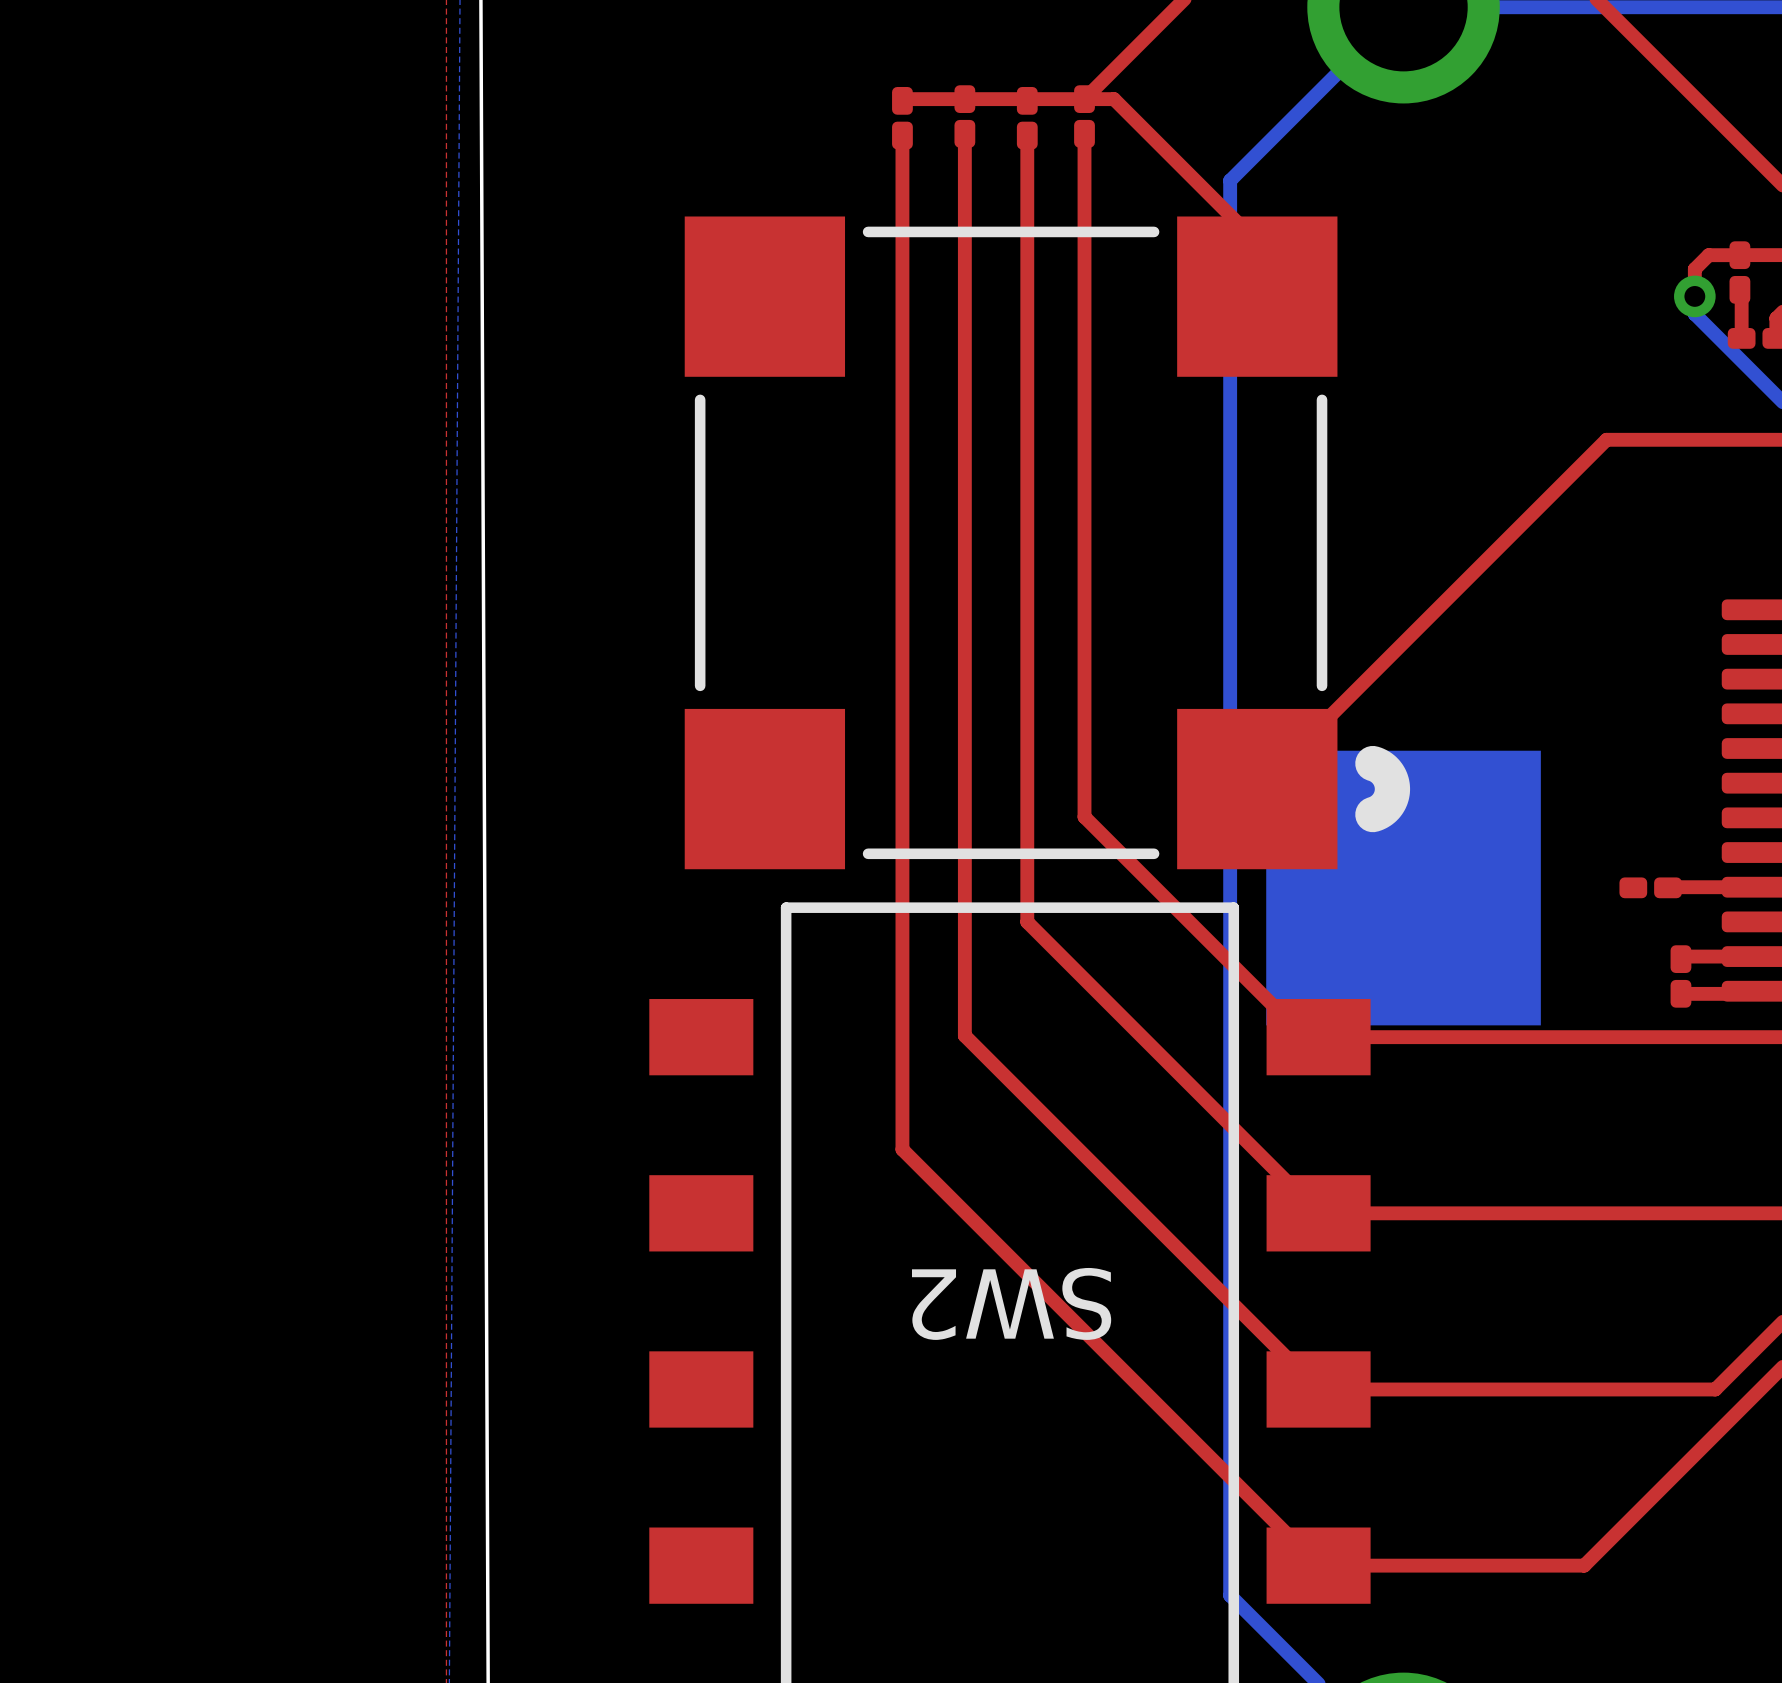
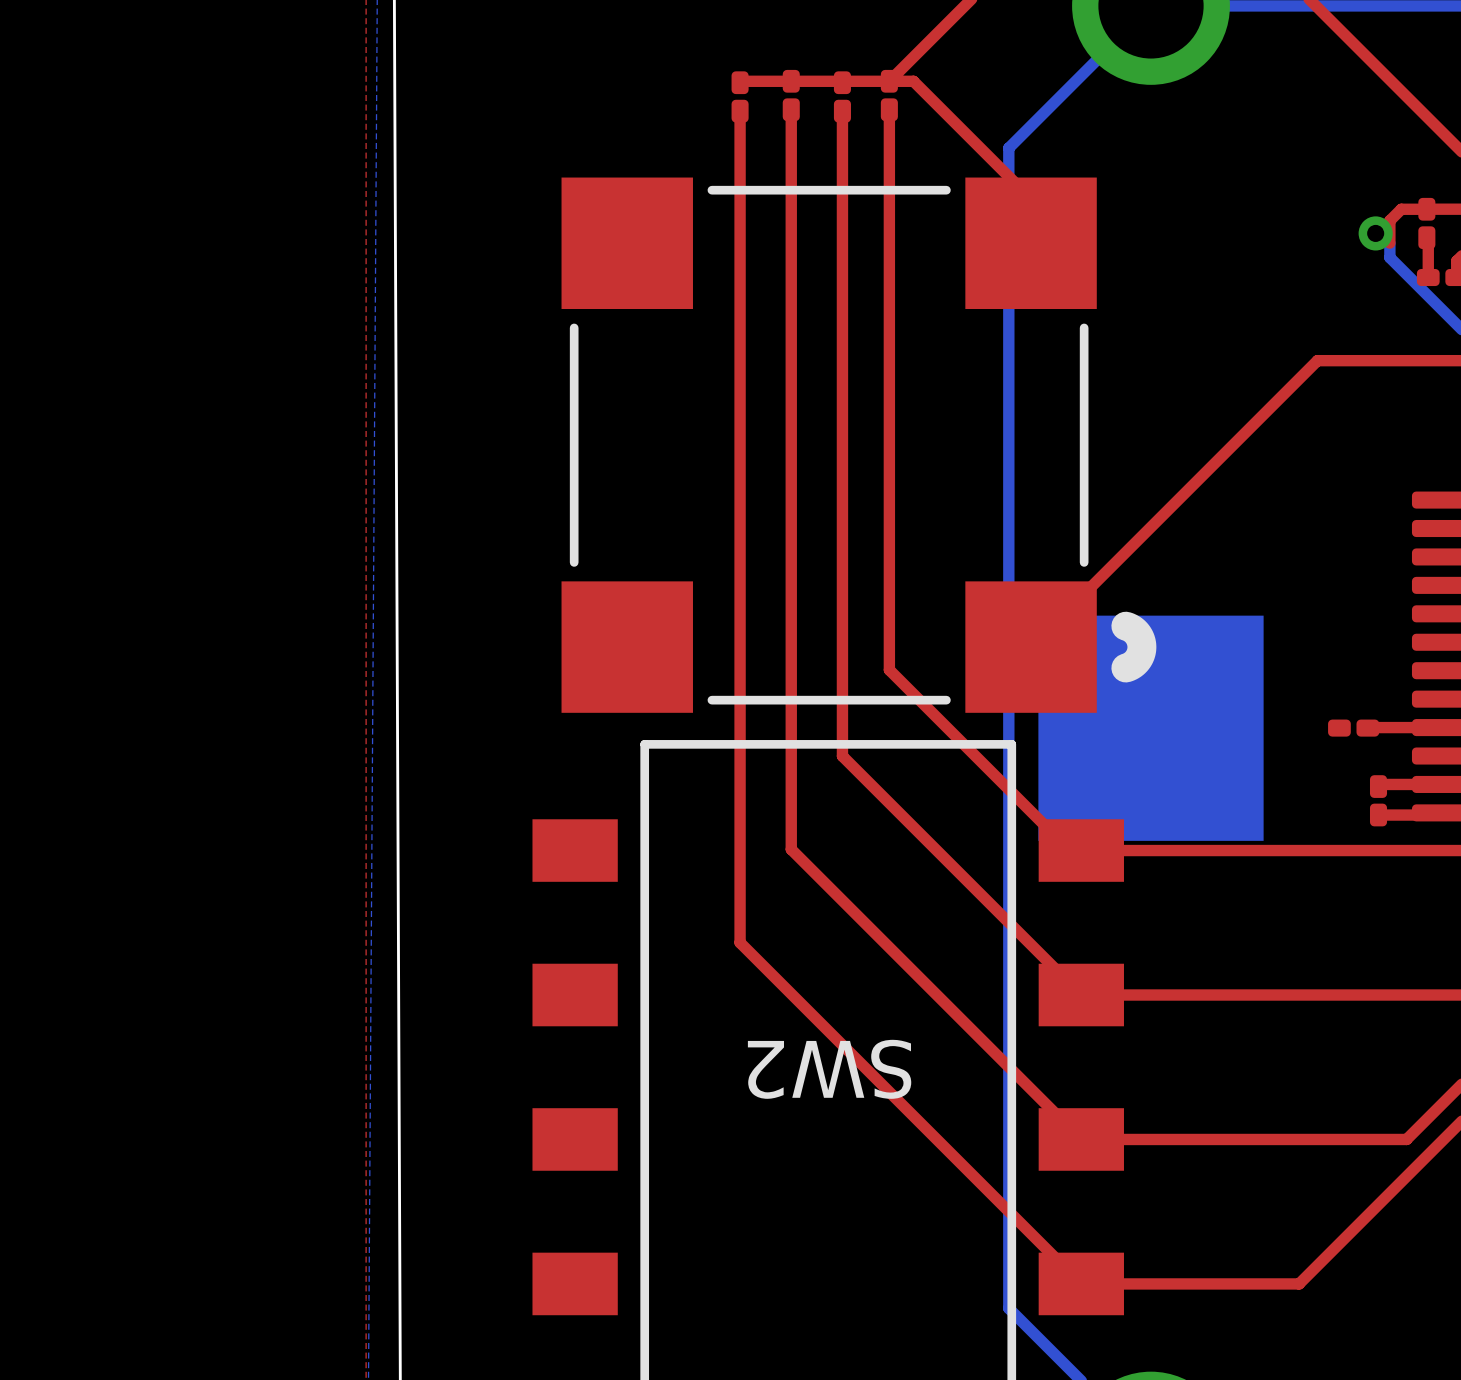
via position: (1694, 296) -> (1375, 233)

